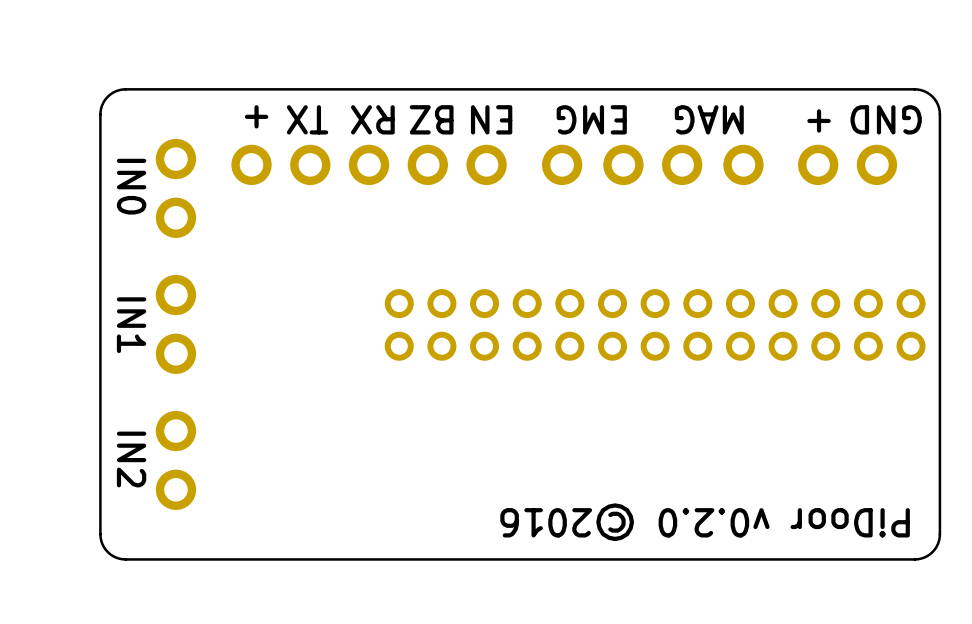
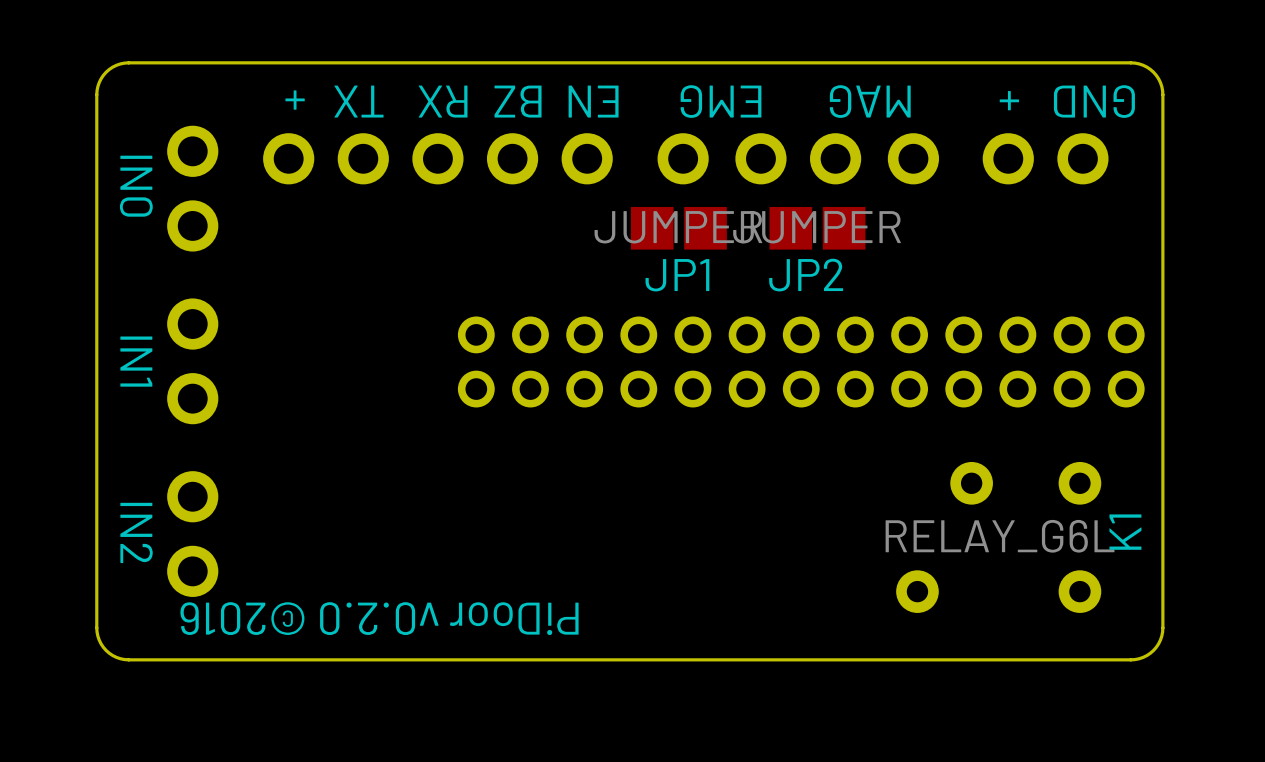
JP1: none -> JUMPER (678, 228)
JP2: none -> JUMPER (817, 228)
K1: none -> RELAY_G6L (998, 537)
text position: PiDoor v0.2.0 ©2016 (705, 522) -> PiDoor v0.2.0 ©2016 (379, 618)

